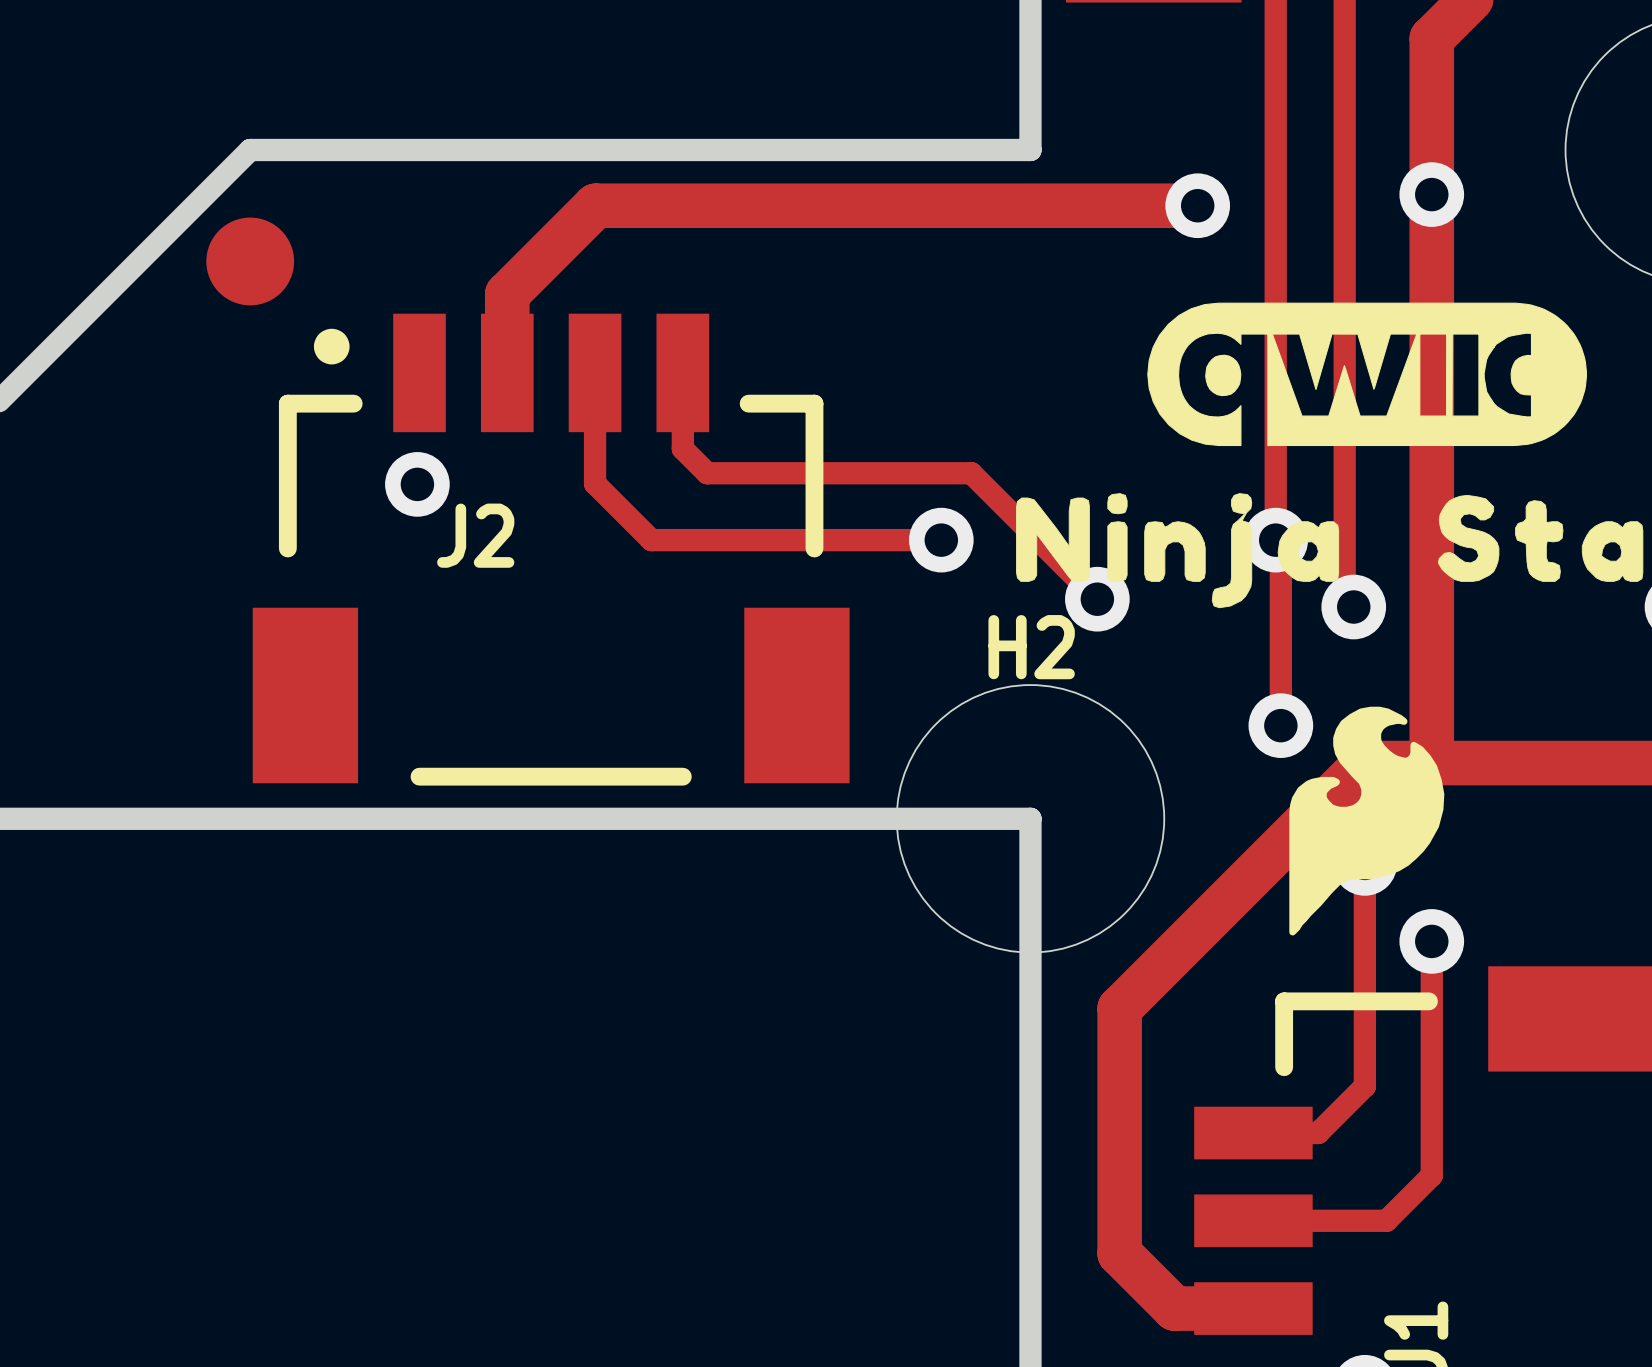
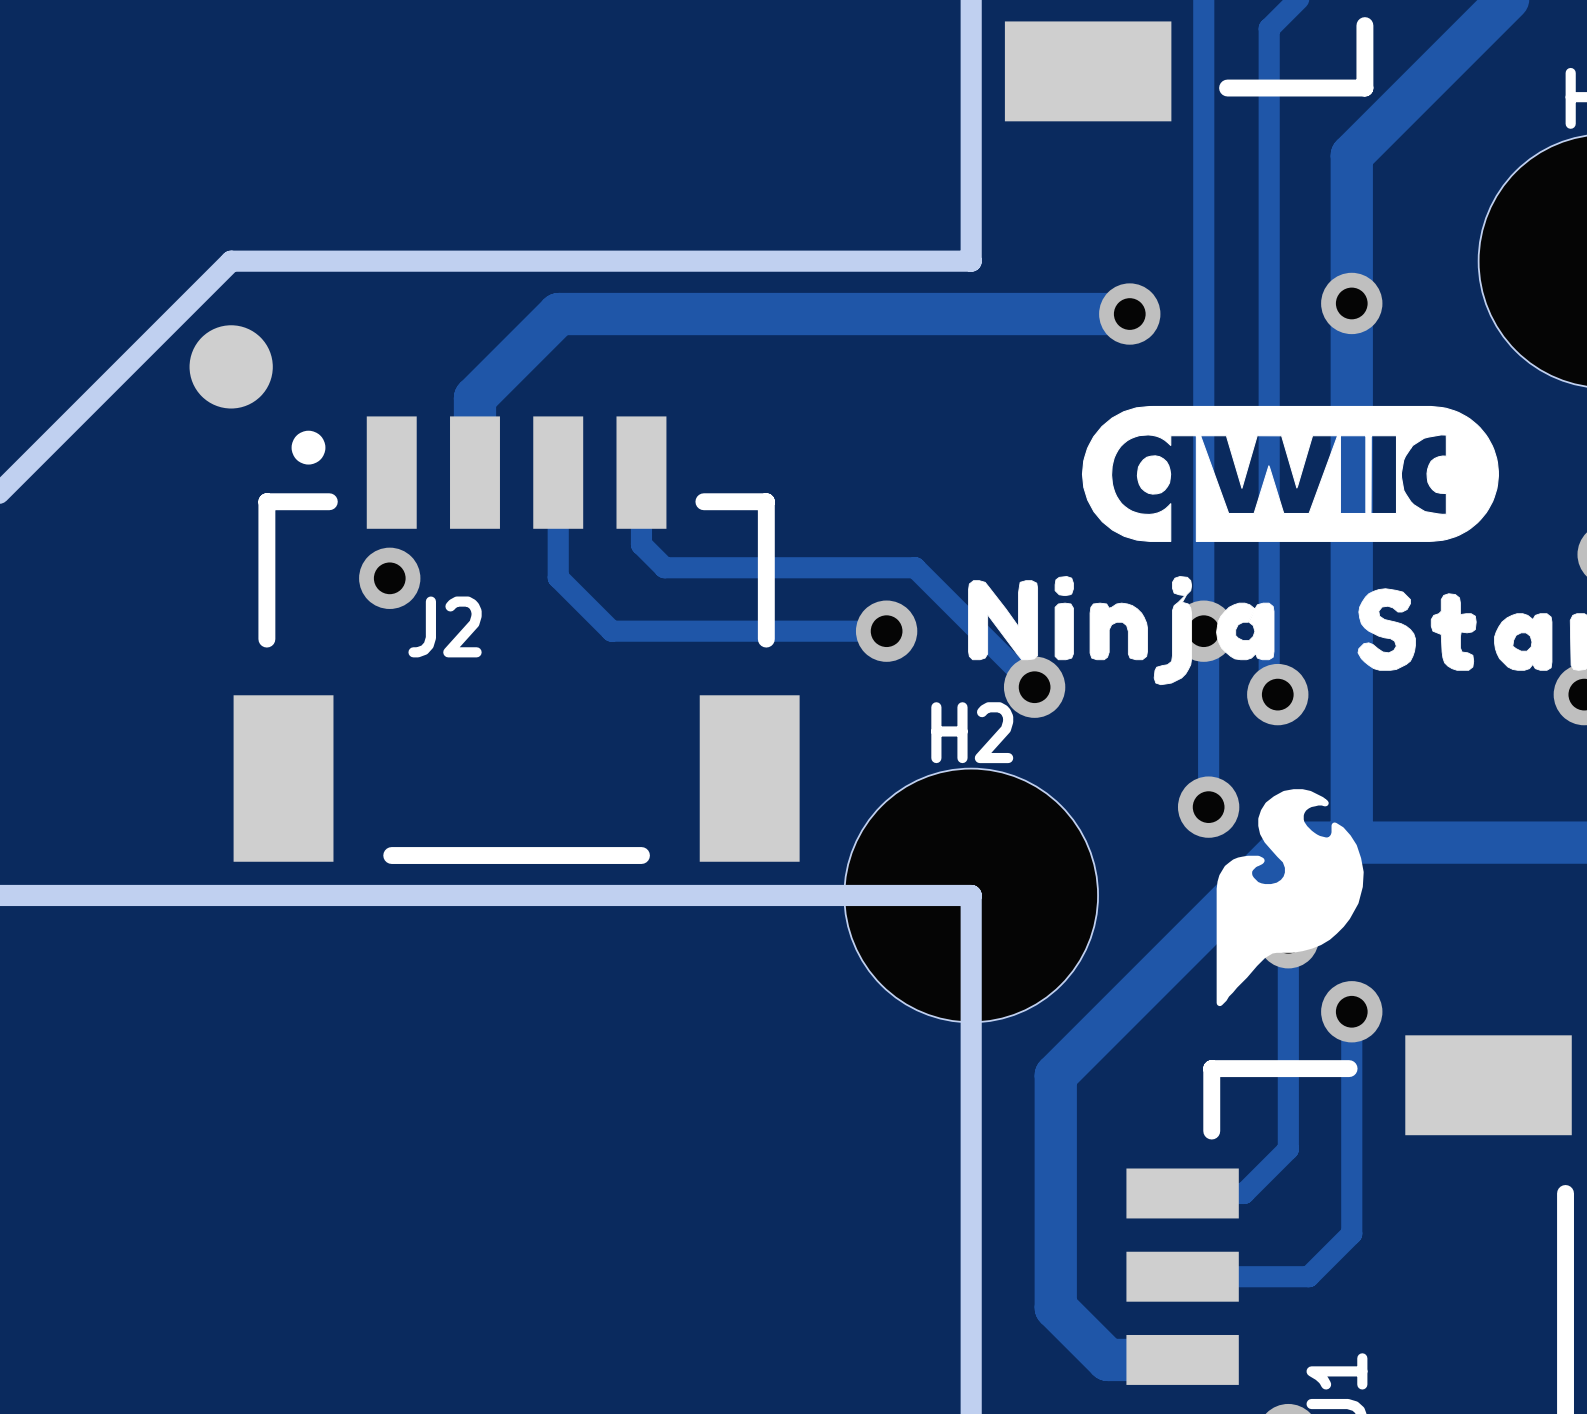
drawing position: (1177, 550) -> (1121, 630)

